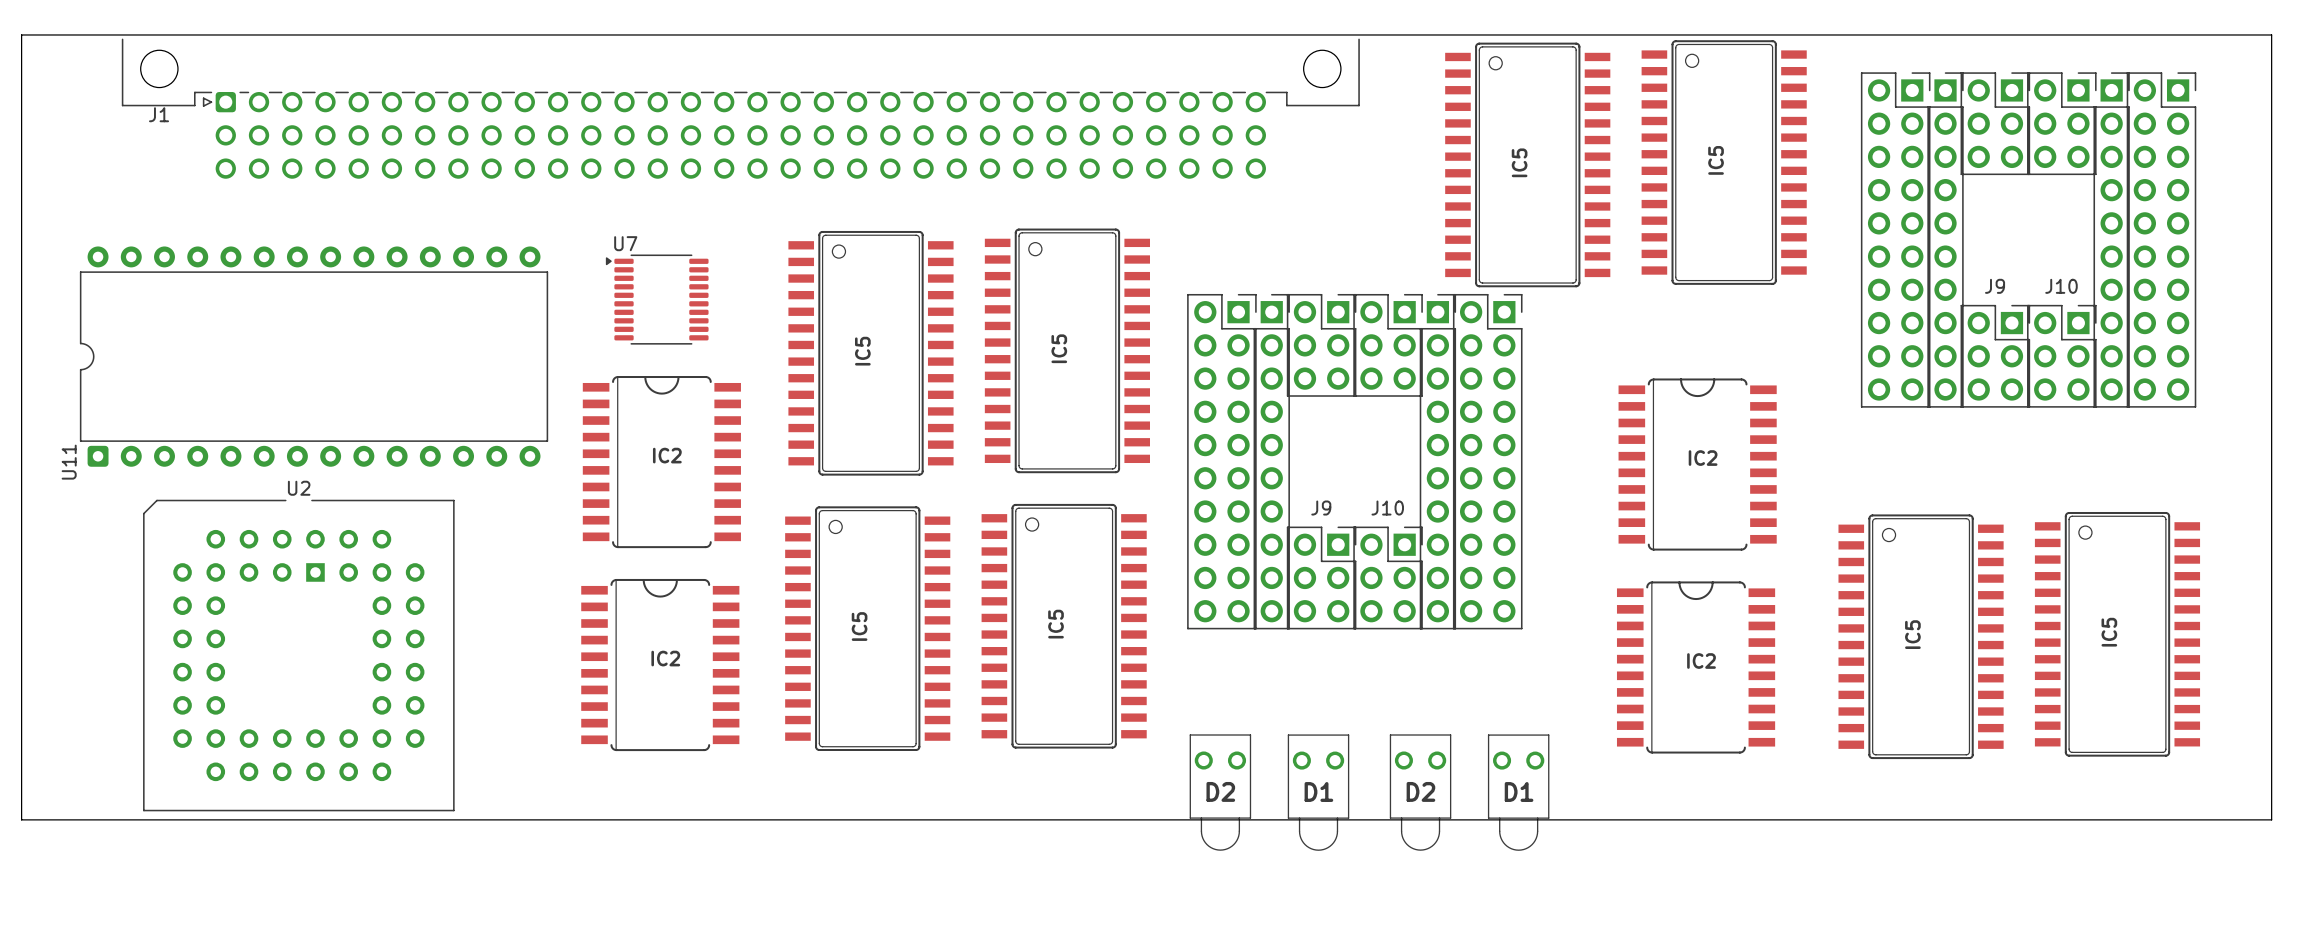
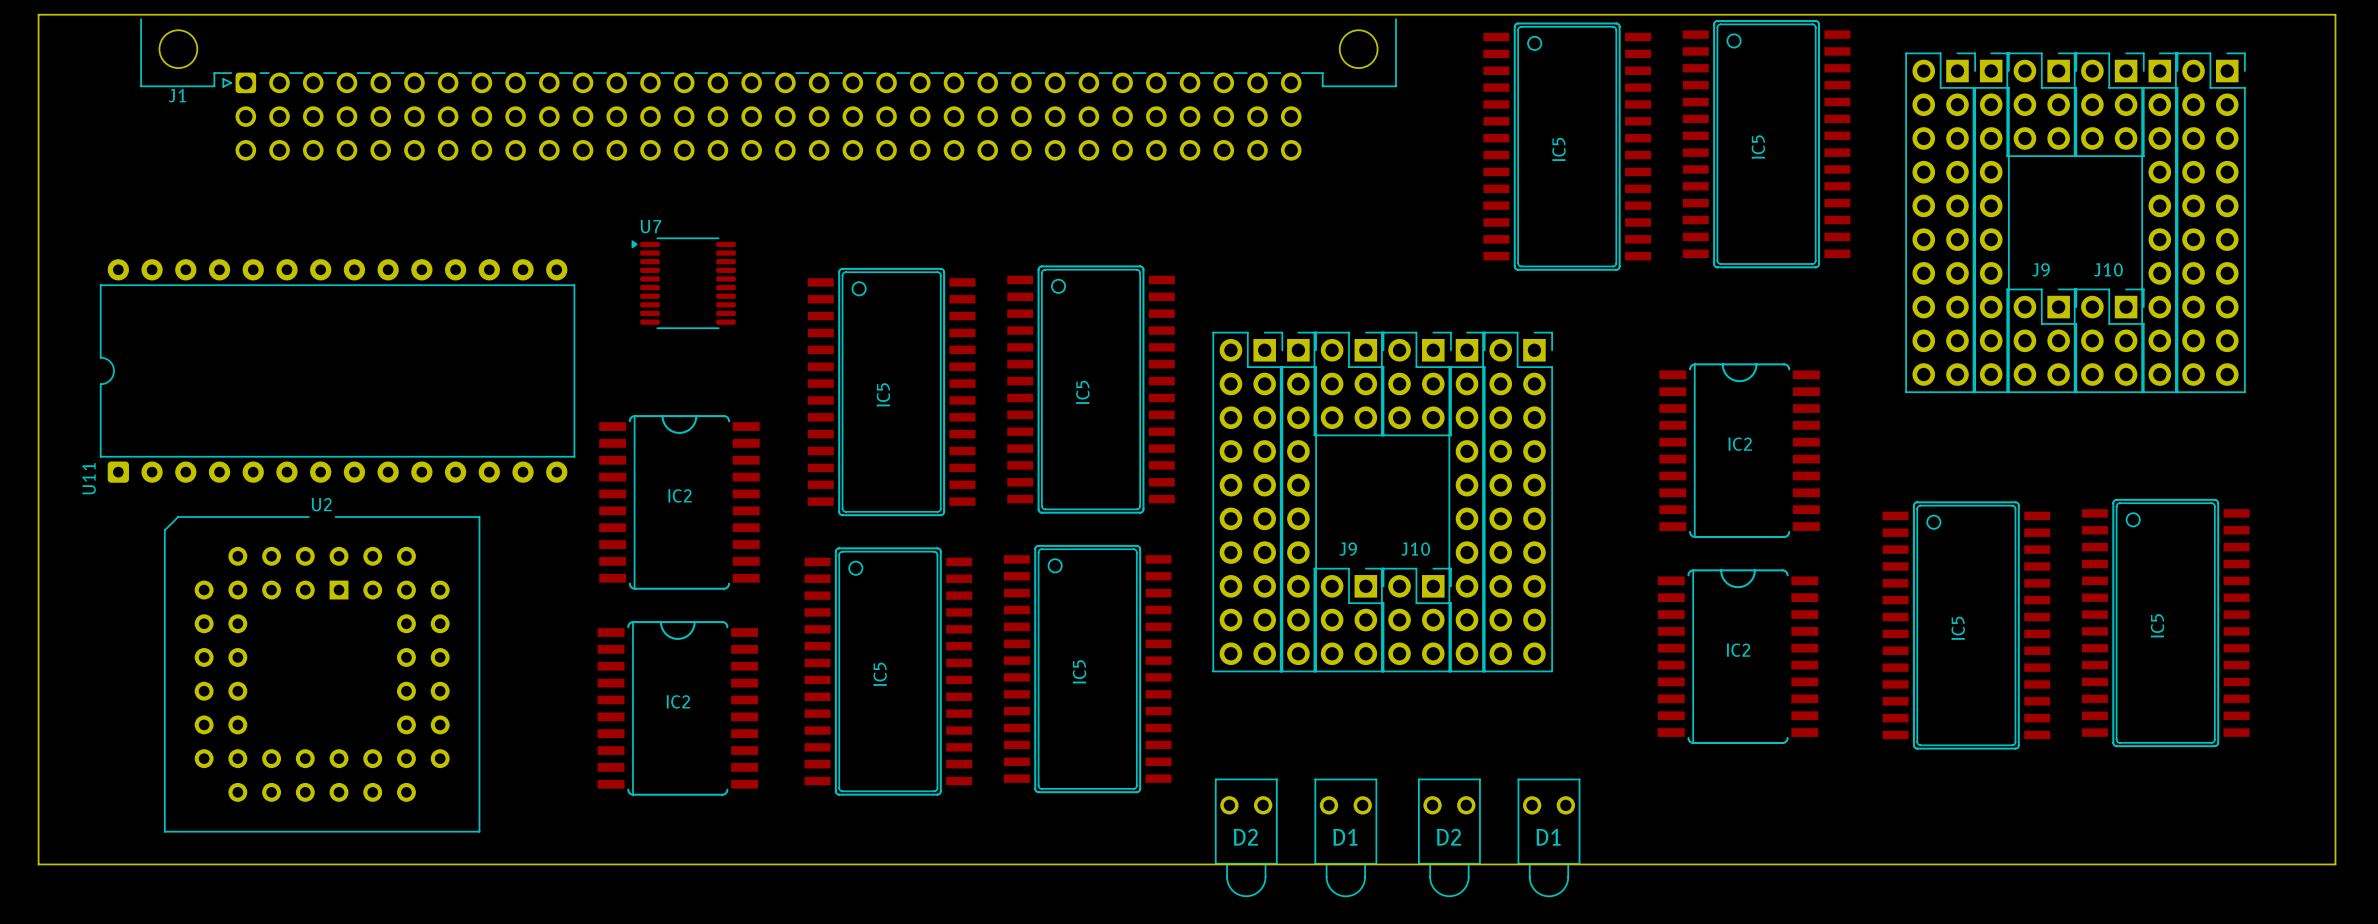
board edge: (2271, 34) (2271, 819) (21, 819) -> (2322, 14) (2335, 14) (2335, 864) (38, 864) (38, 811)
part: (1321, 345) -> none
part: (1388, 345) -> none
IC5 position: (1067, 350) -> (1091, 389)
IC5 position: (870, 353) -> (891, 392)
U11 position: (314, 356) -> (337, 370)
part: none -> (1348, 383)
part: none -> (1416, 383)
part position: (1221, 461) -> (1247, 502)
part position: (1271, 461) -> (1298, 502)
part position: (1437, 461) -> (1467, 502)
part position: (1487, 461) -> (1517, 502)
IC2 position: (661, 462) -> (679, 502)
J9 position: (1321, 577) -> (1348, 620)
J10 position: (1388, 577) -> (1416, 620)
IC5 position: (1064, 626) -> (1087, 669)
IC5 position: (867, 628) -> (888, 671)
U2 position: (298, 655) -> (322, 674)
IC2 position: (660, 665) -> (677, 708)
D2 position: (1220, 792) -> (1246, 837)
D1 position: (1318, 792) -> (1345, 837)
D2 position: (1420, 792) -> (1449, 837)
D1 position: (1518, 792) -> (1548, 837)

